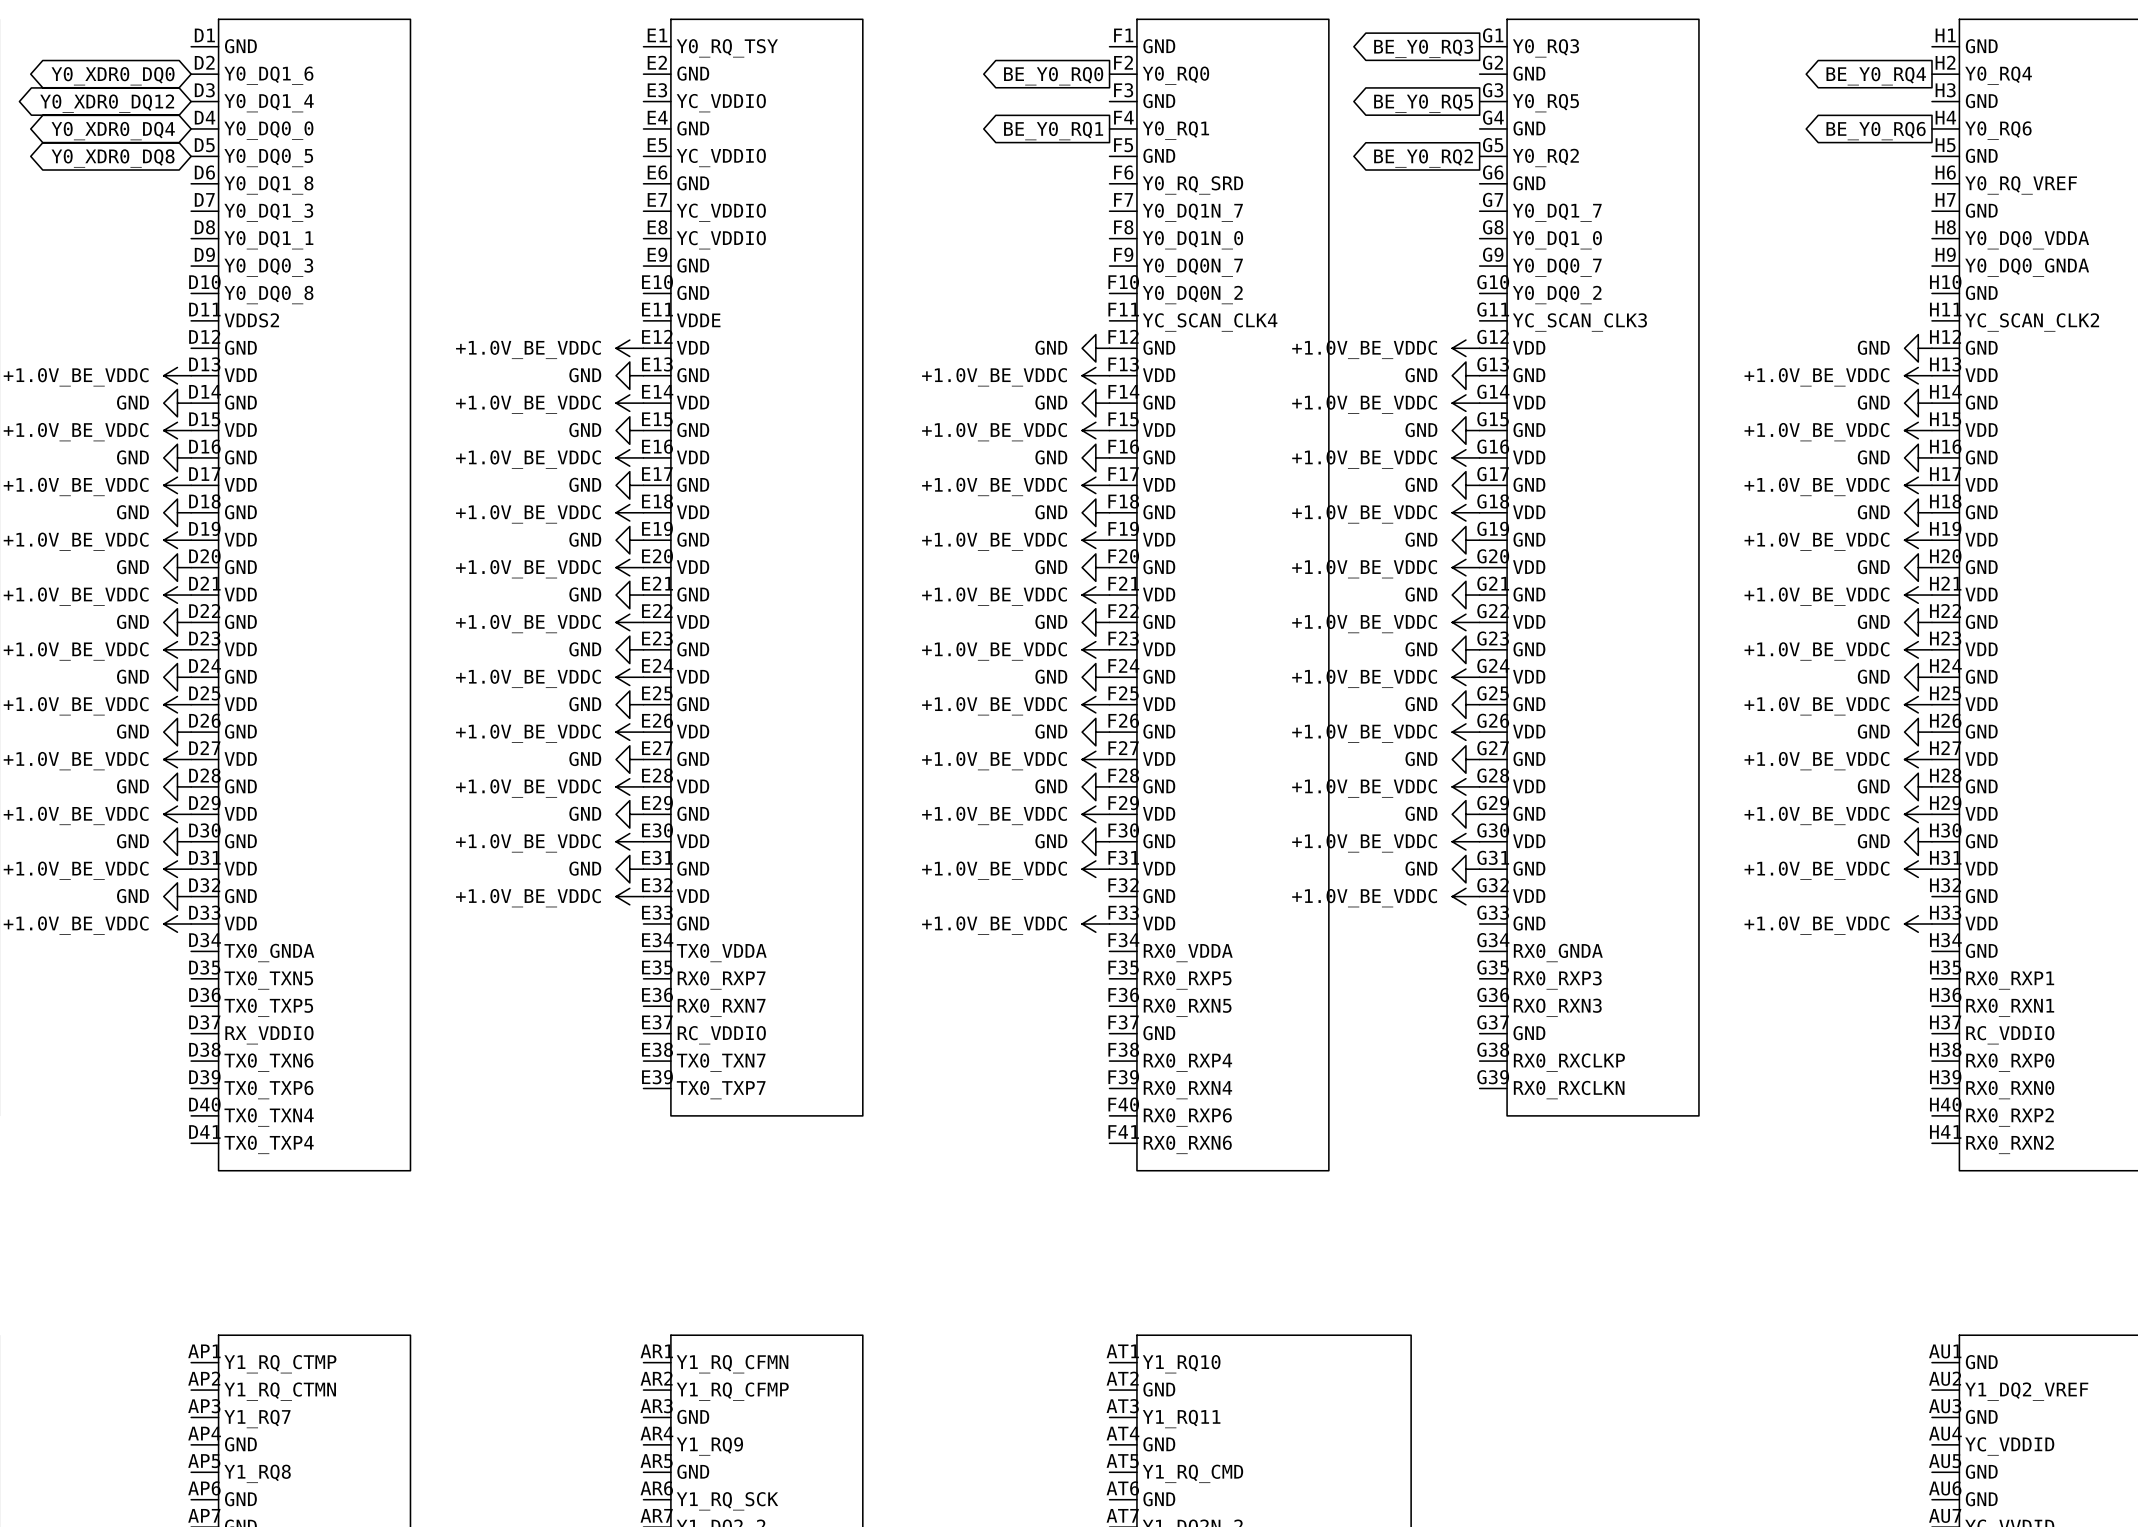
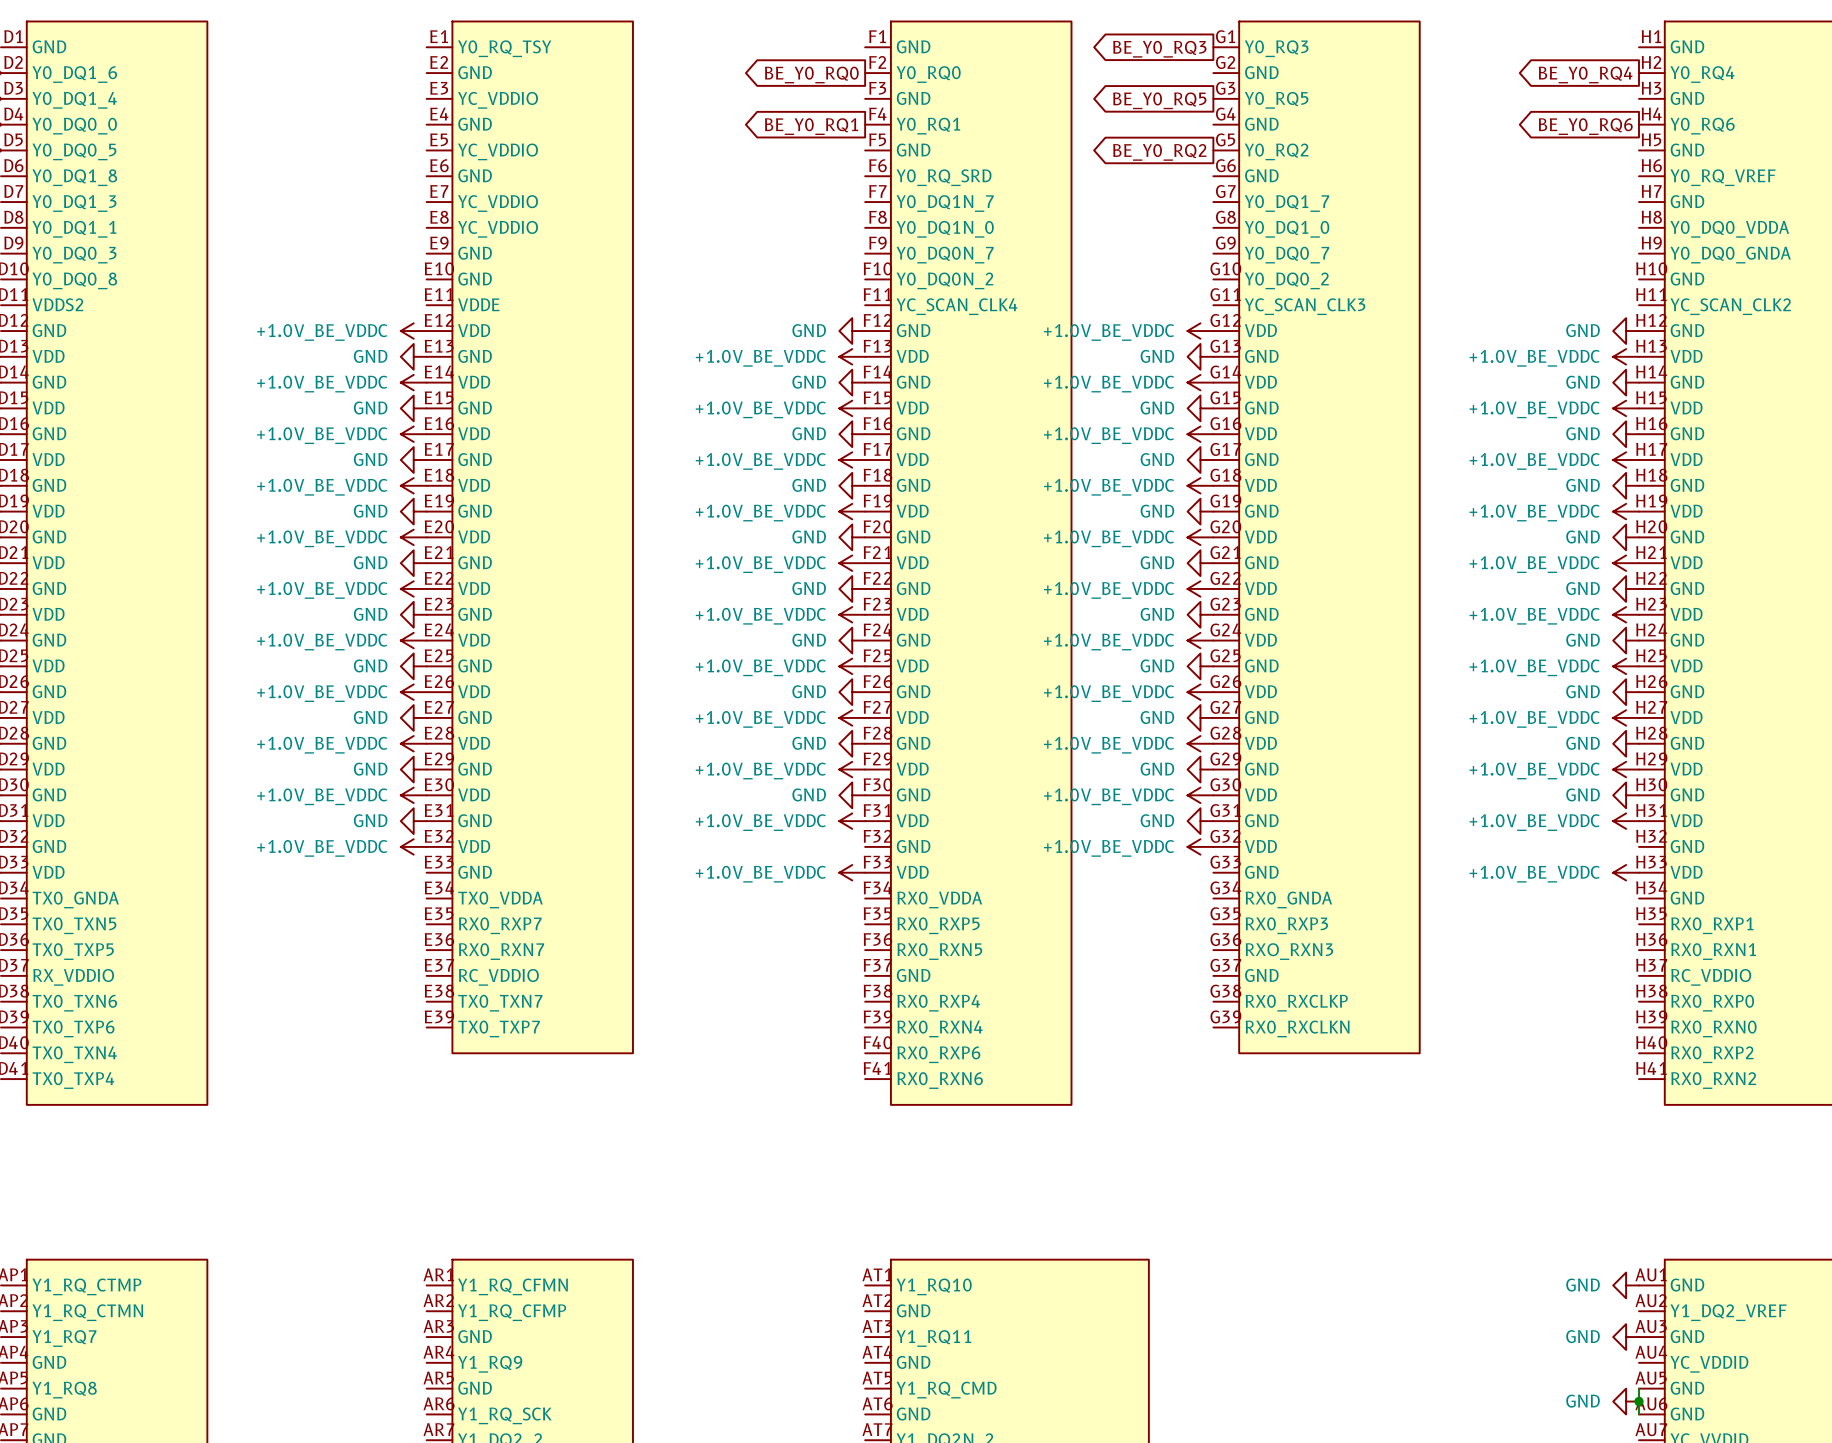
power symbol: none -> GND (1626, 1285)
power symbol: none -> GND (1626, 1337)
wire: none -> (1638, 1388) (1638, 1414)
power symbol: none -> GND (1626, 1401)
junction: none -> (1638, 1401)

